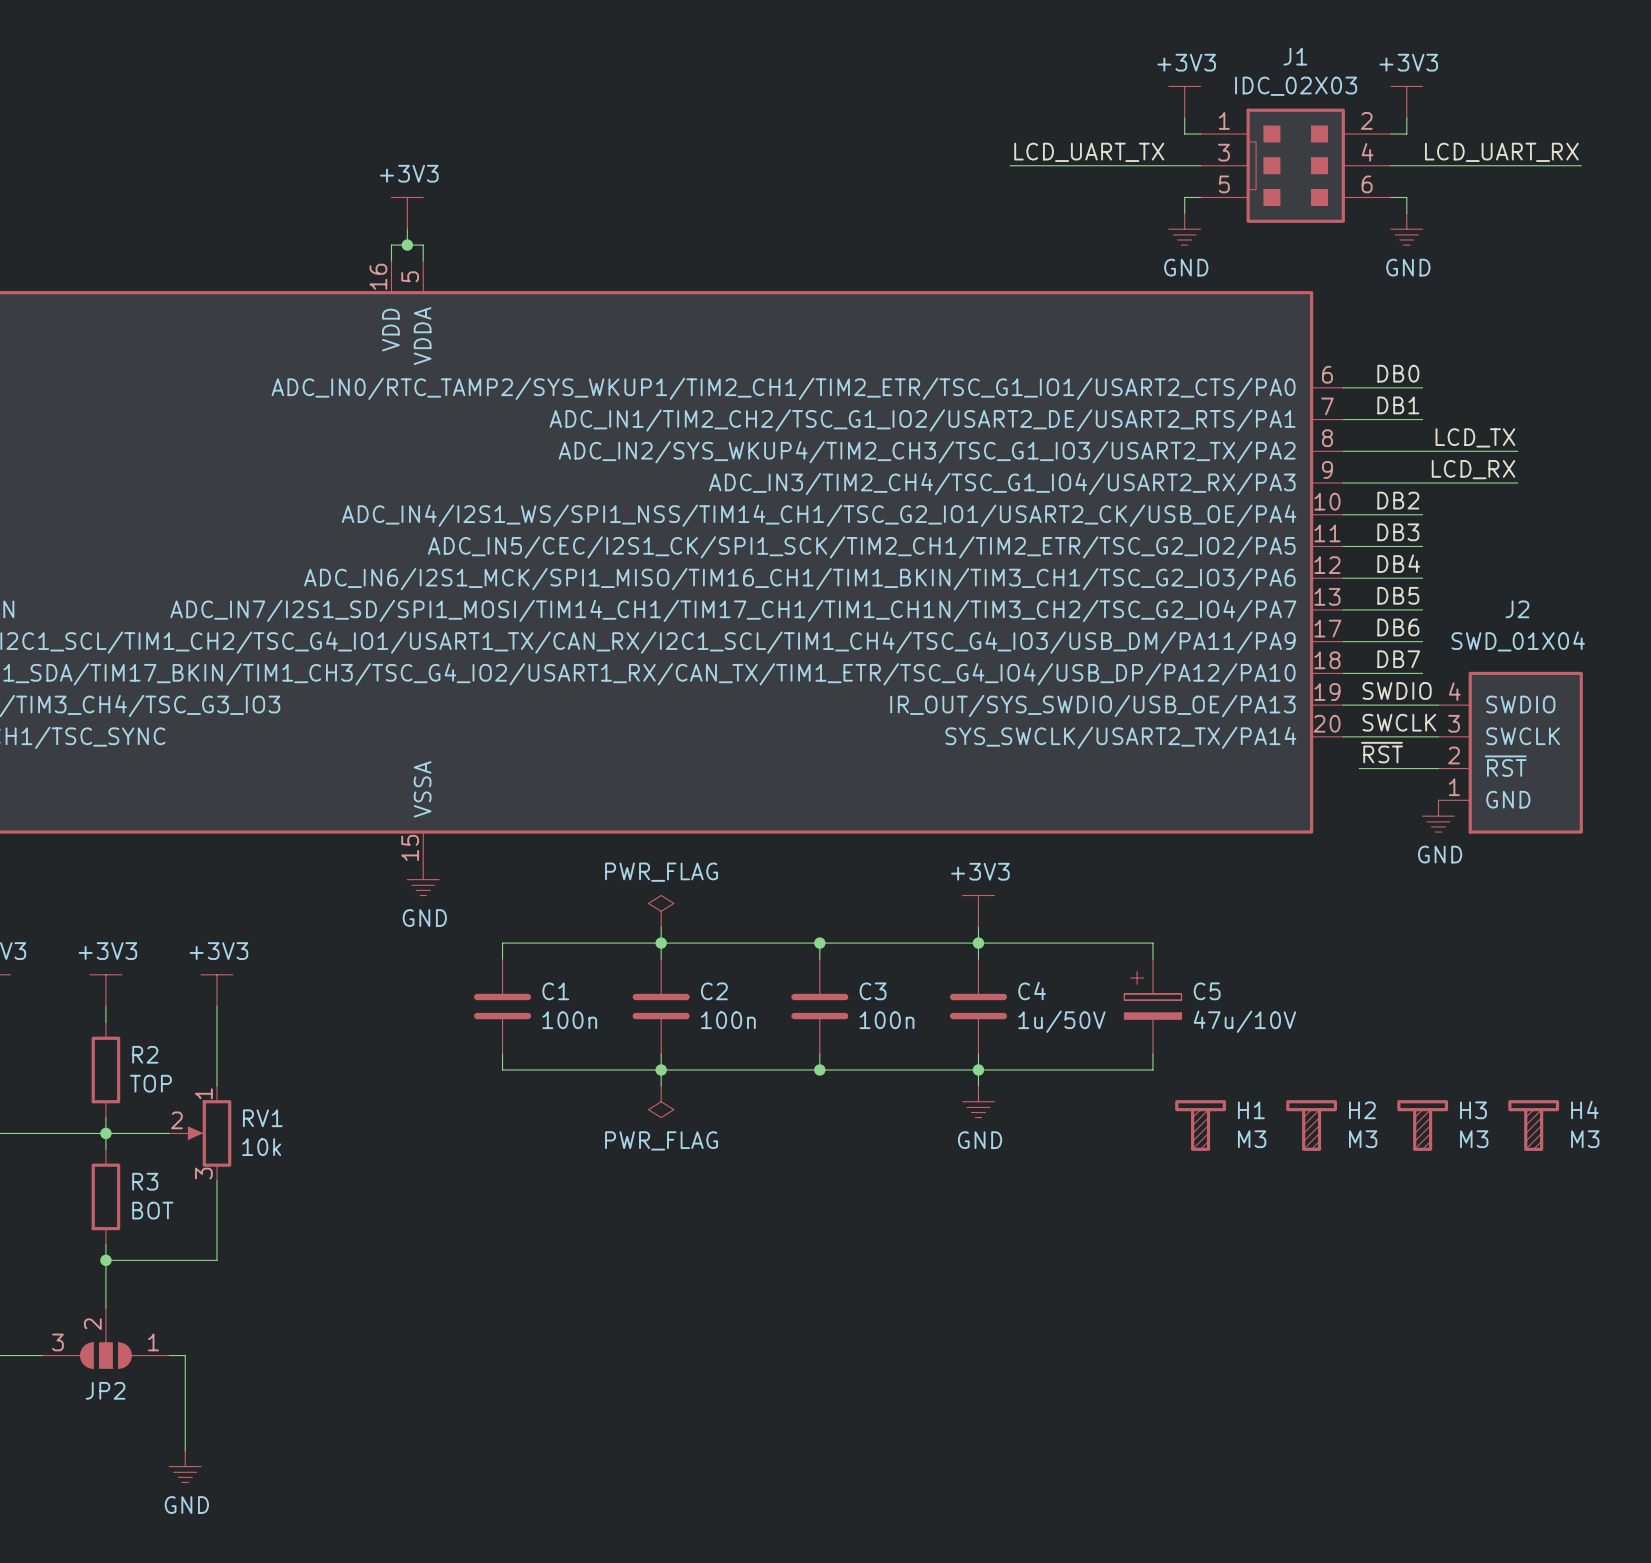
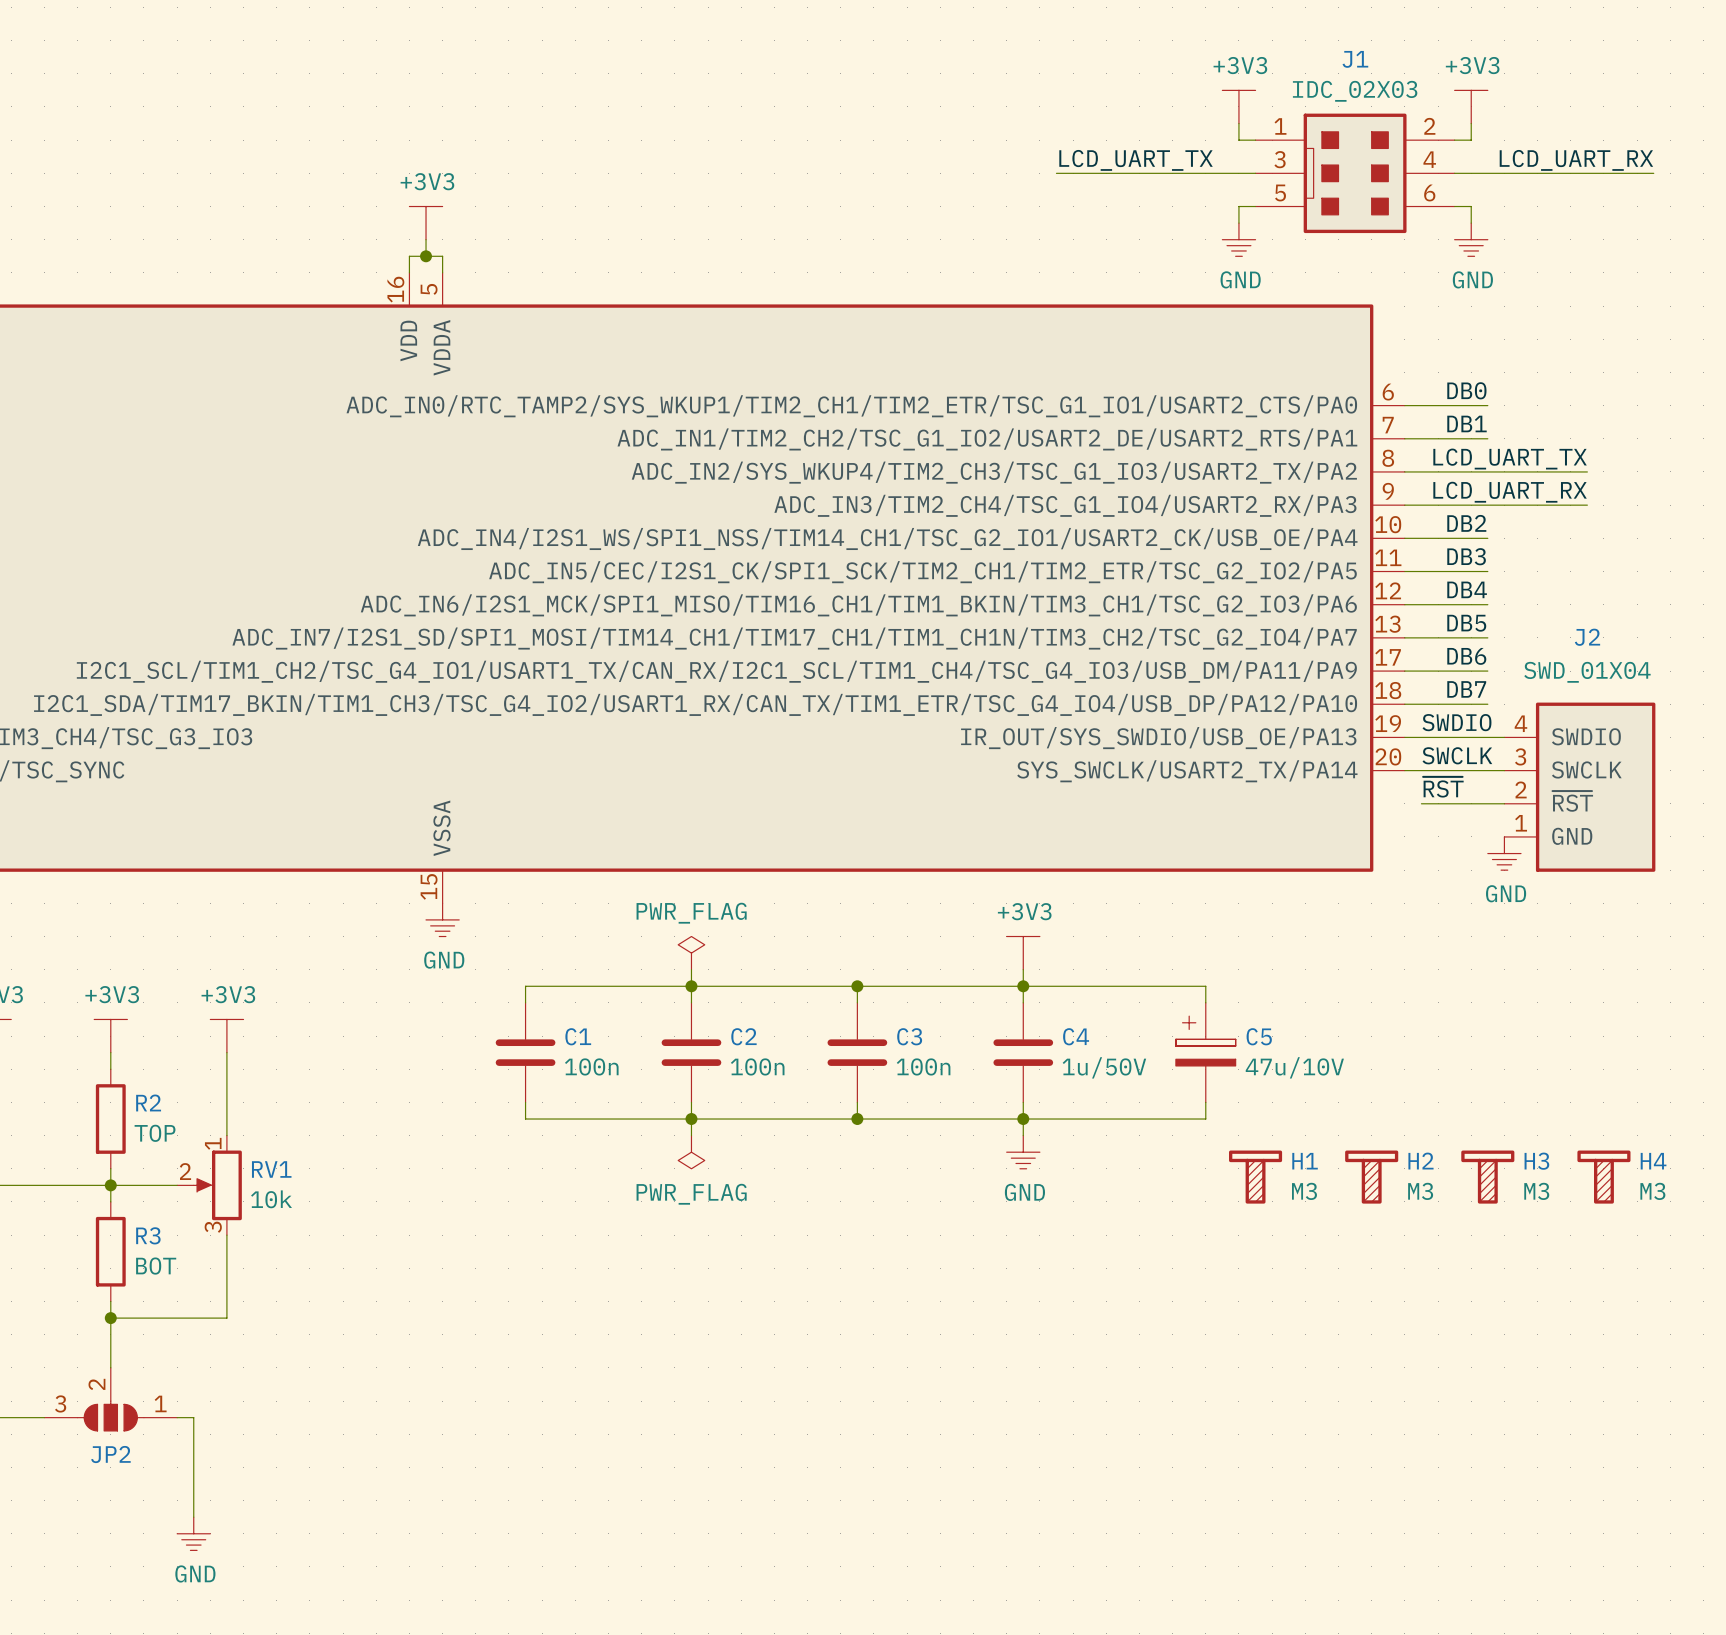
label: LCD_TX (1475, 437) -> LCD_UART_TX (1510, 459)
label: LCD_RX (1473, 469) -> LCD_UART_RX (1510, 492)

